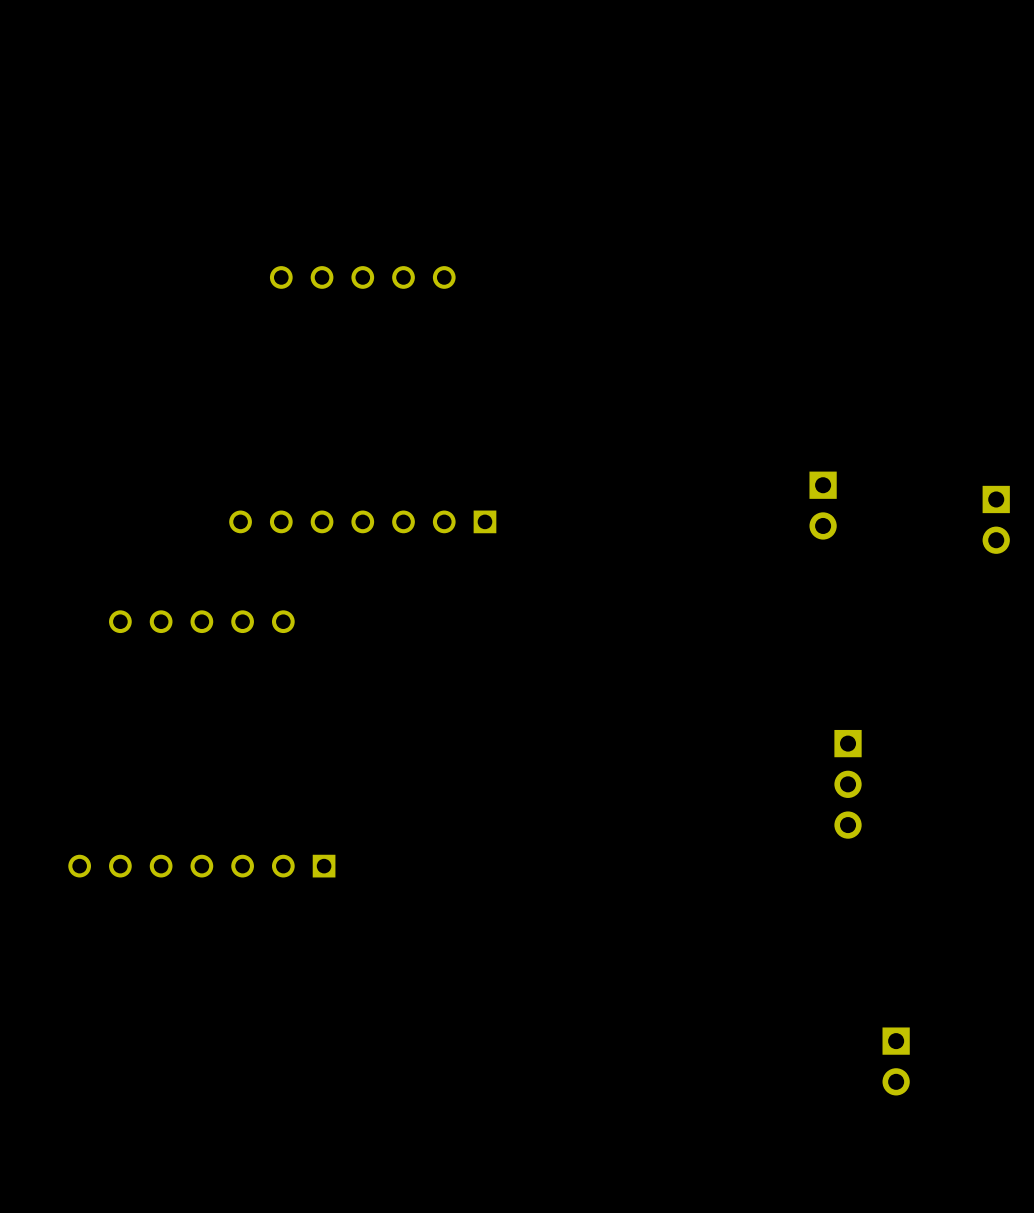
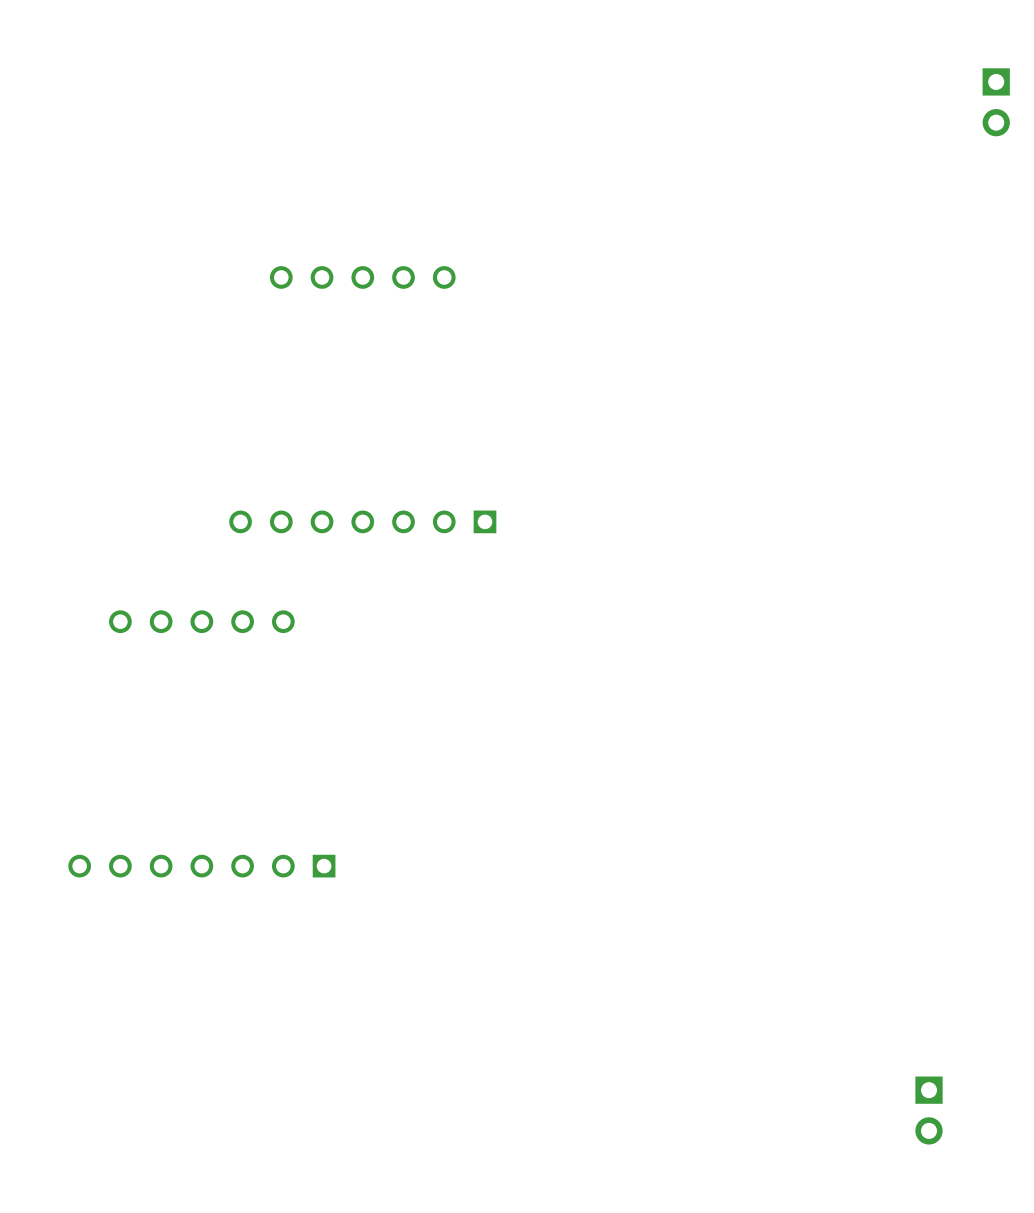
part: none -> (996, 102)
part: (823, 505) -> none
part: (996, 519) -> none
part: (848, 784) -> none
part position: (896, 1061) -> (929, 1110)

